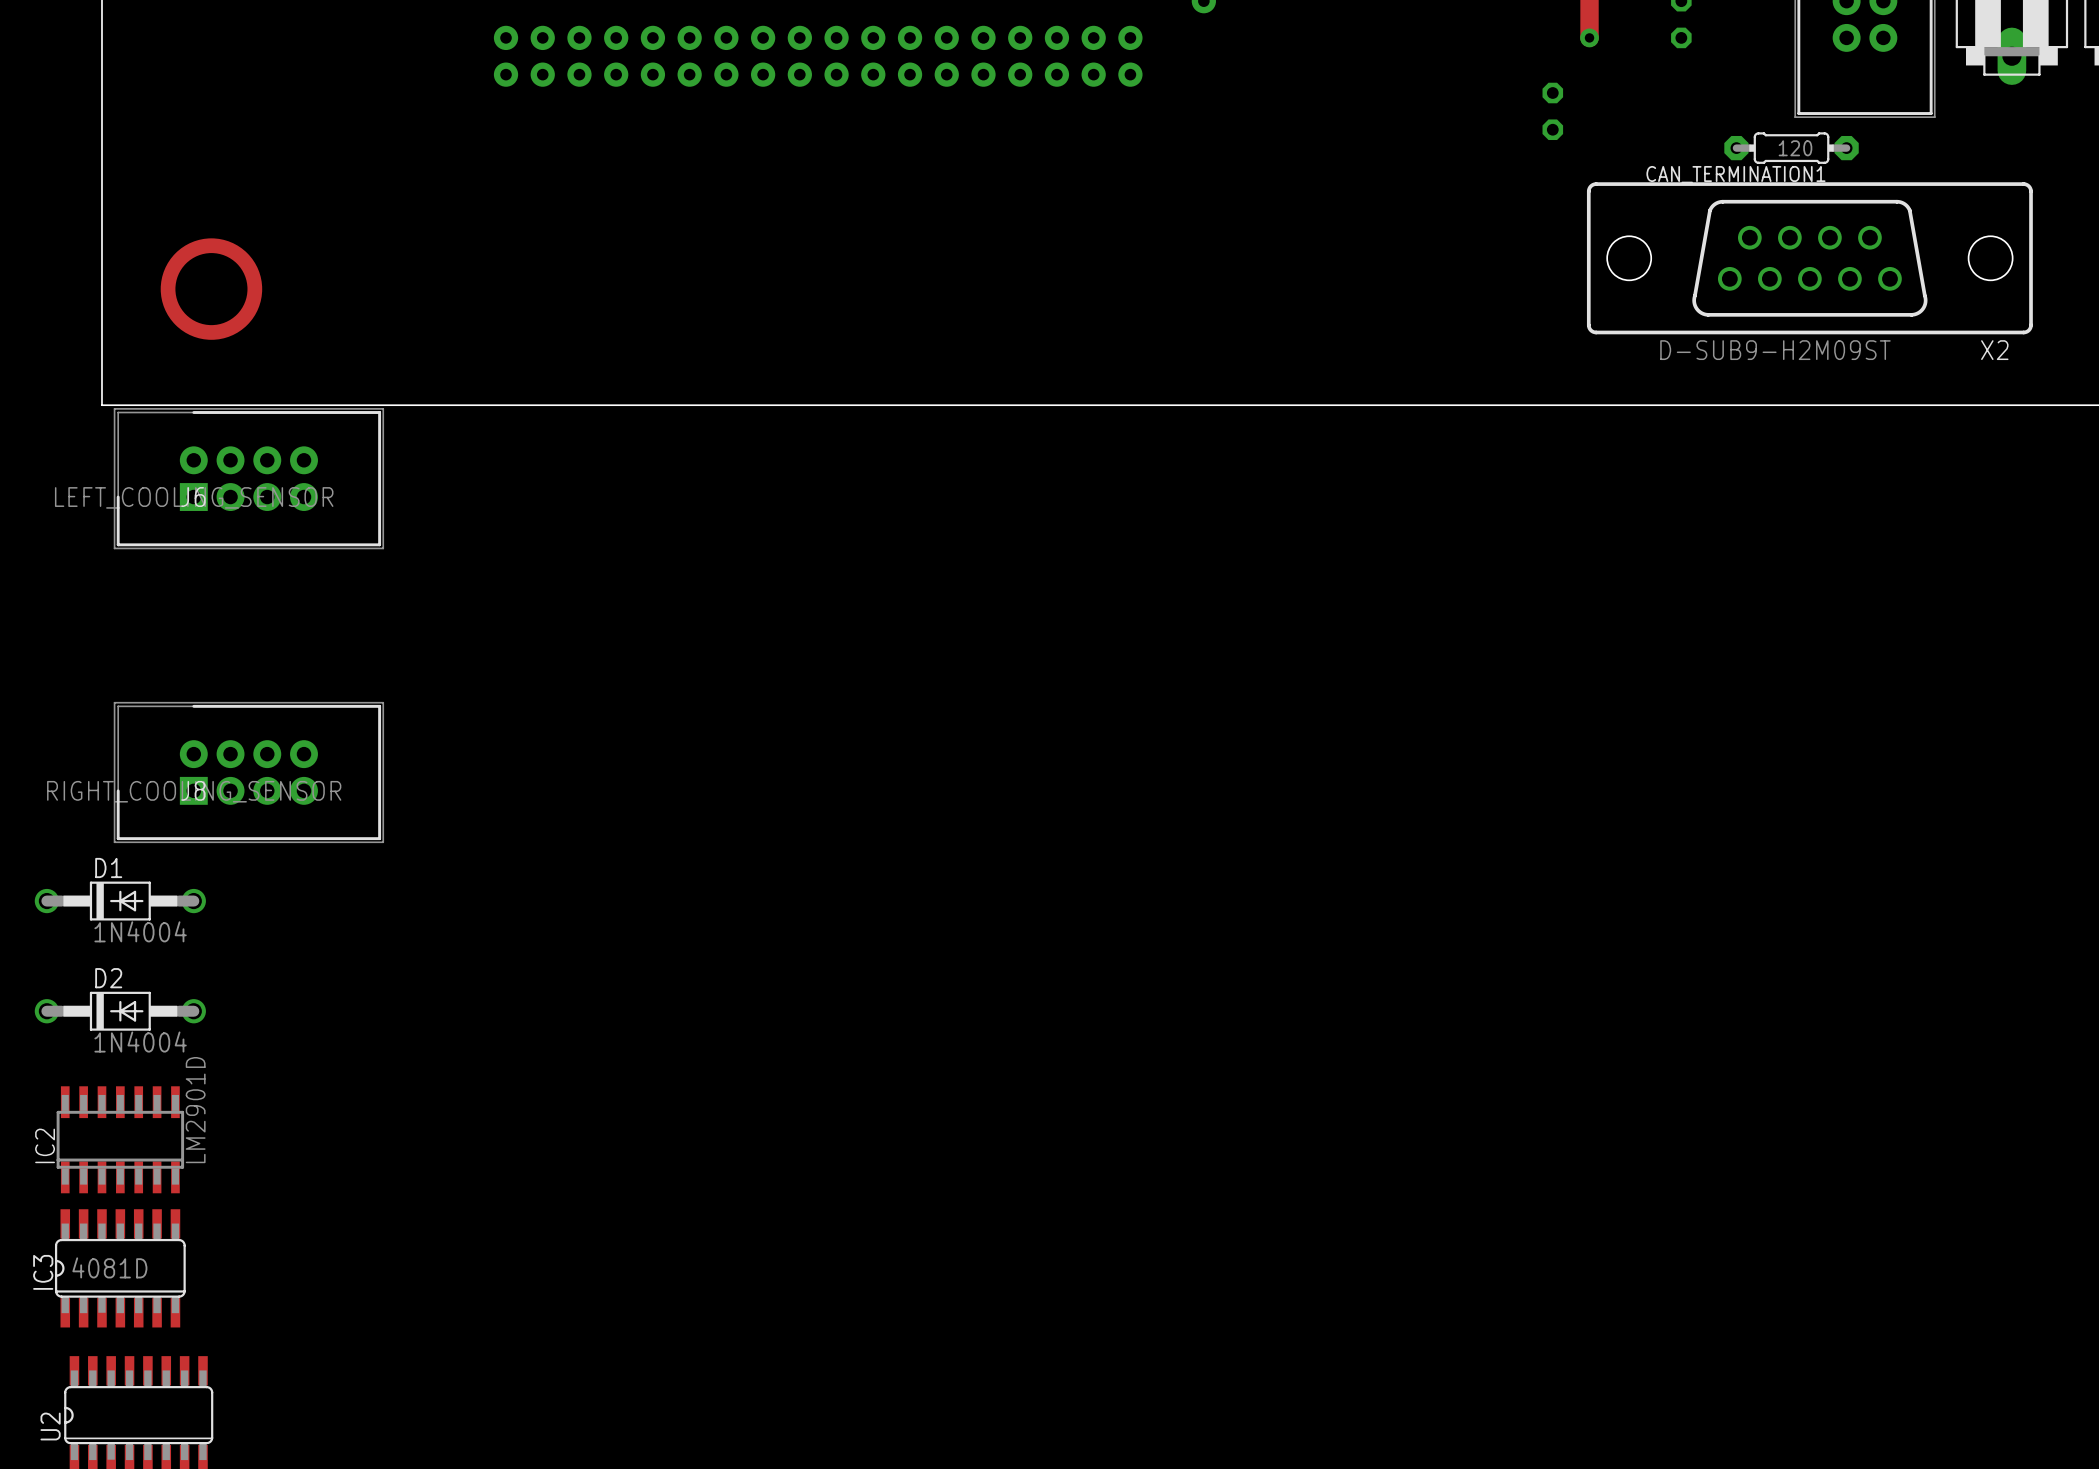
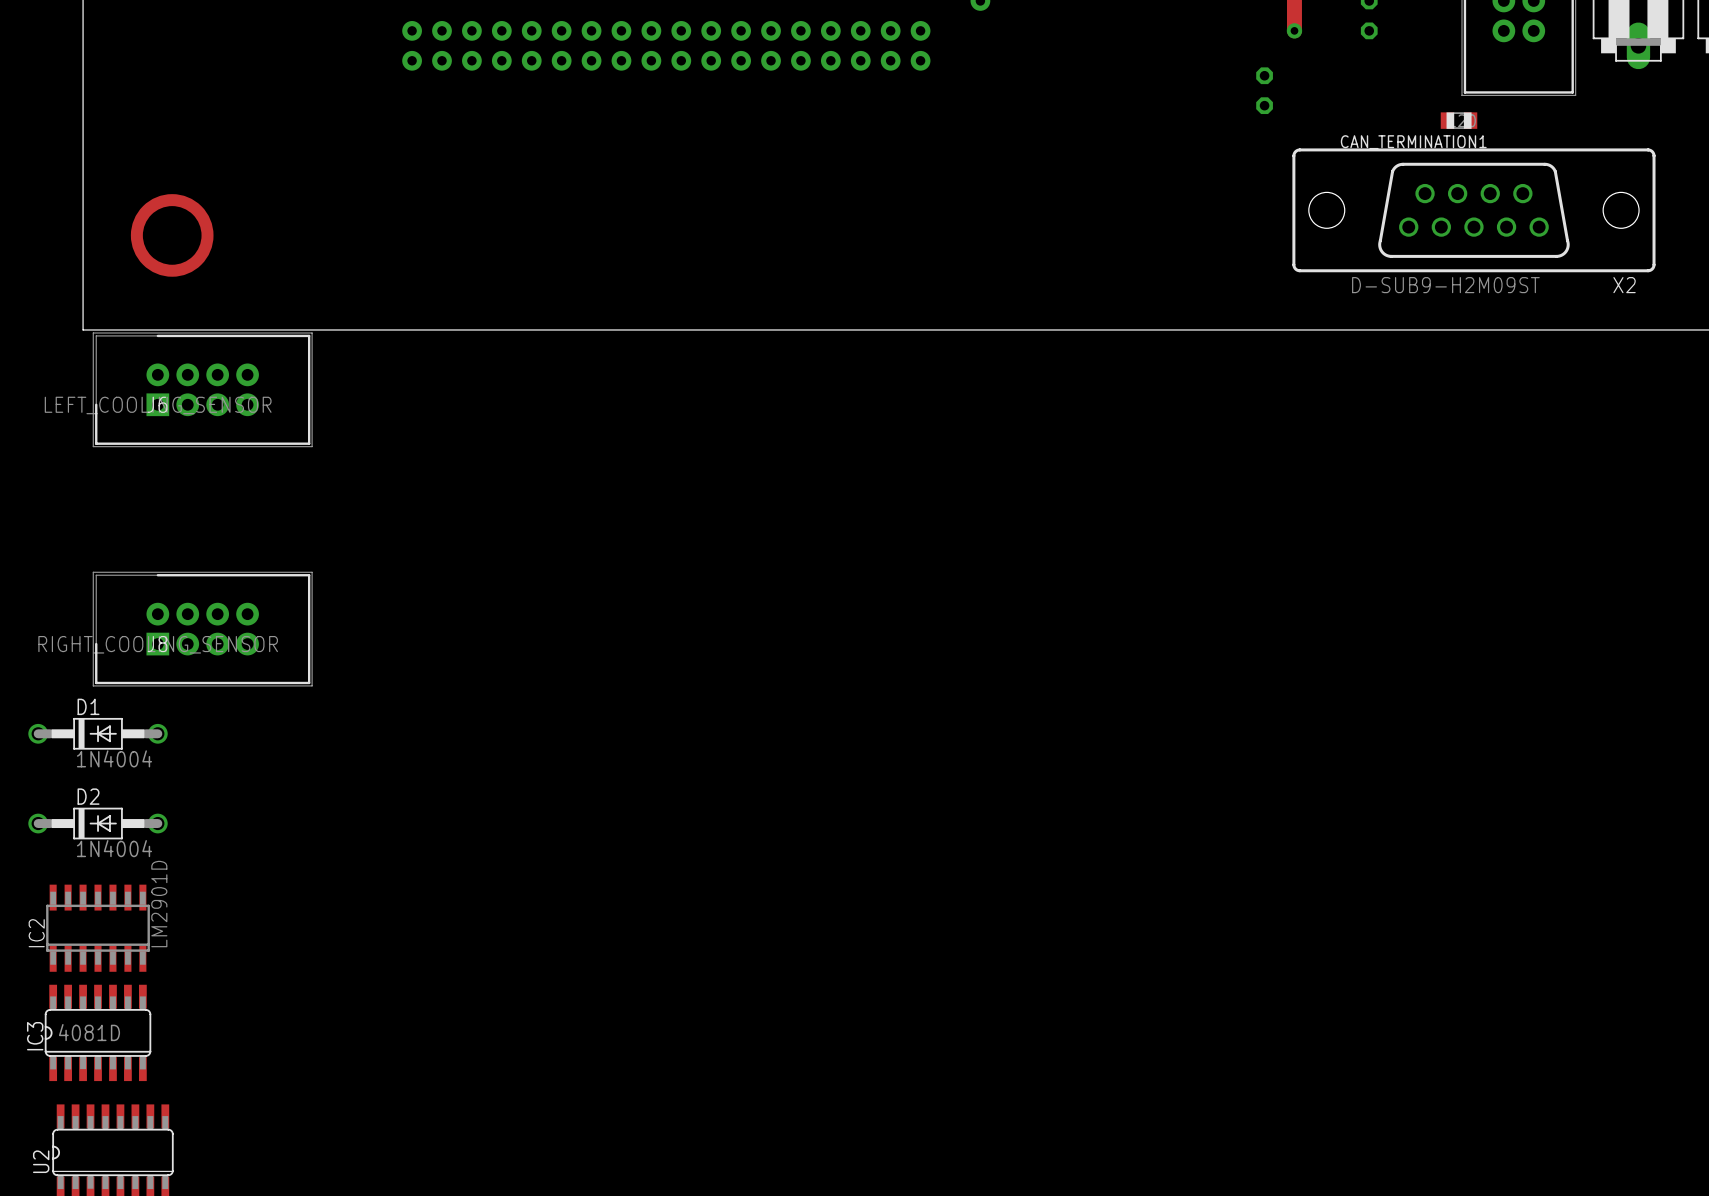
CAN_TERMINATION1 footprint: [1724, 132, 1859, 164] -> [1440, 112, 1478, 129]

